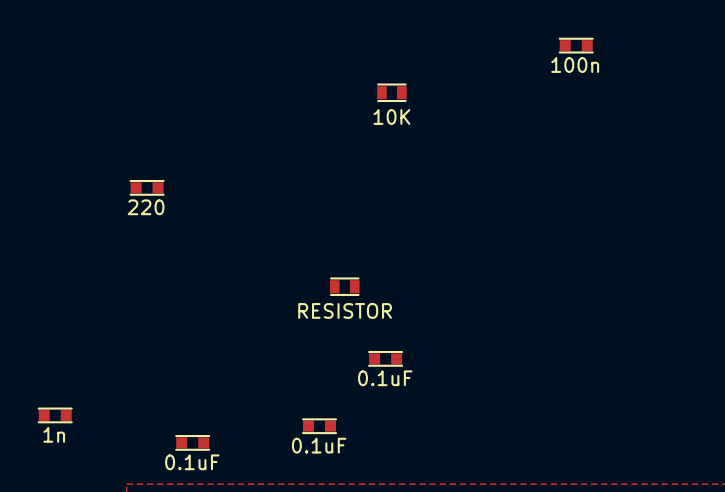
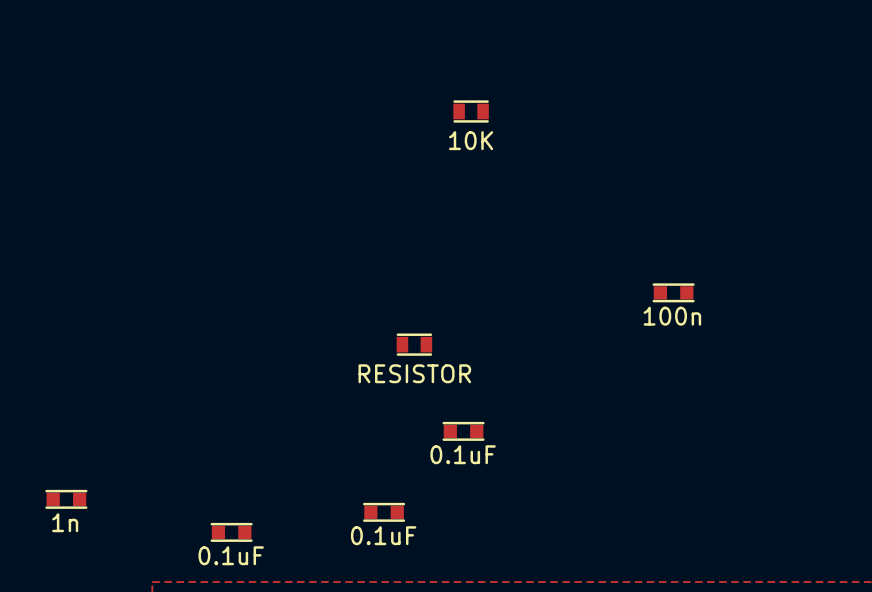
part position: (576, 45) -> (673, 292)
part: 220 (147, 187) -> none

